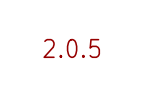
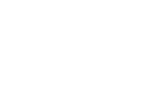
text: 2.0.5 (71, 48) -> none

